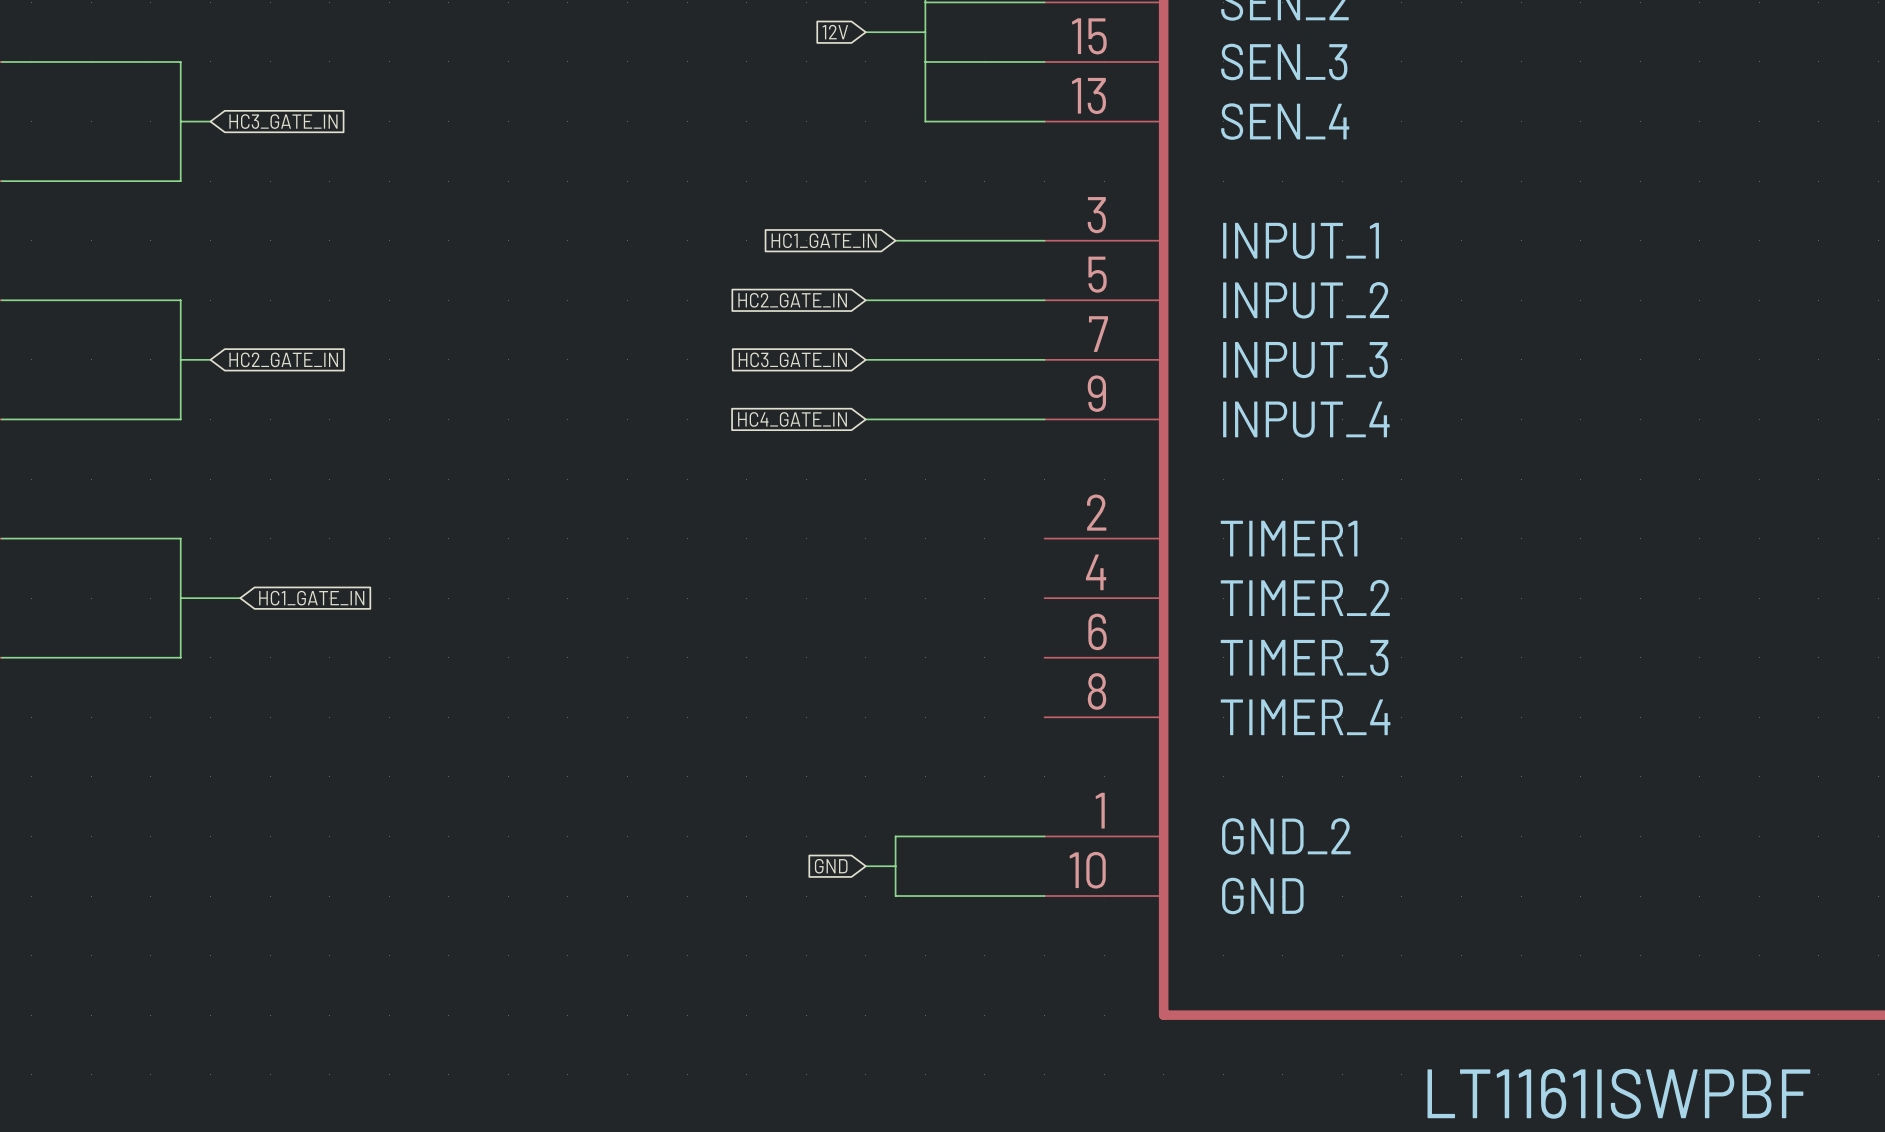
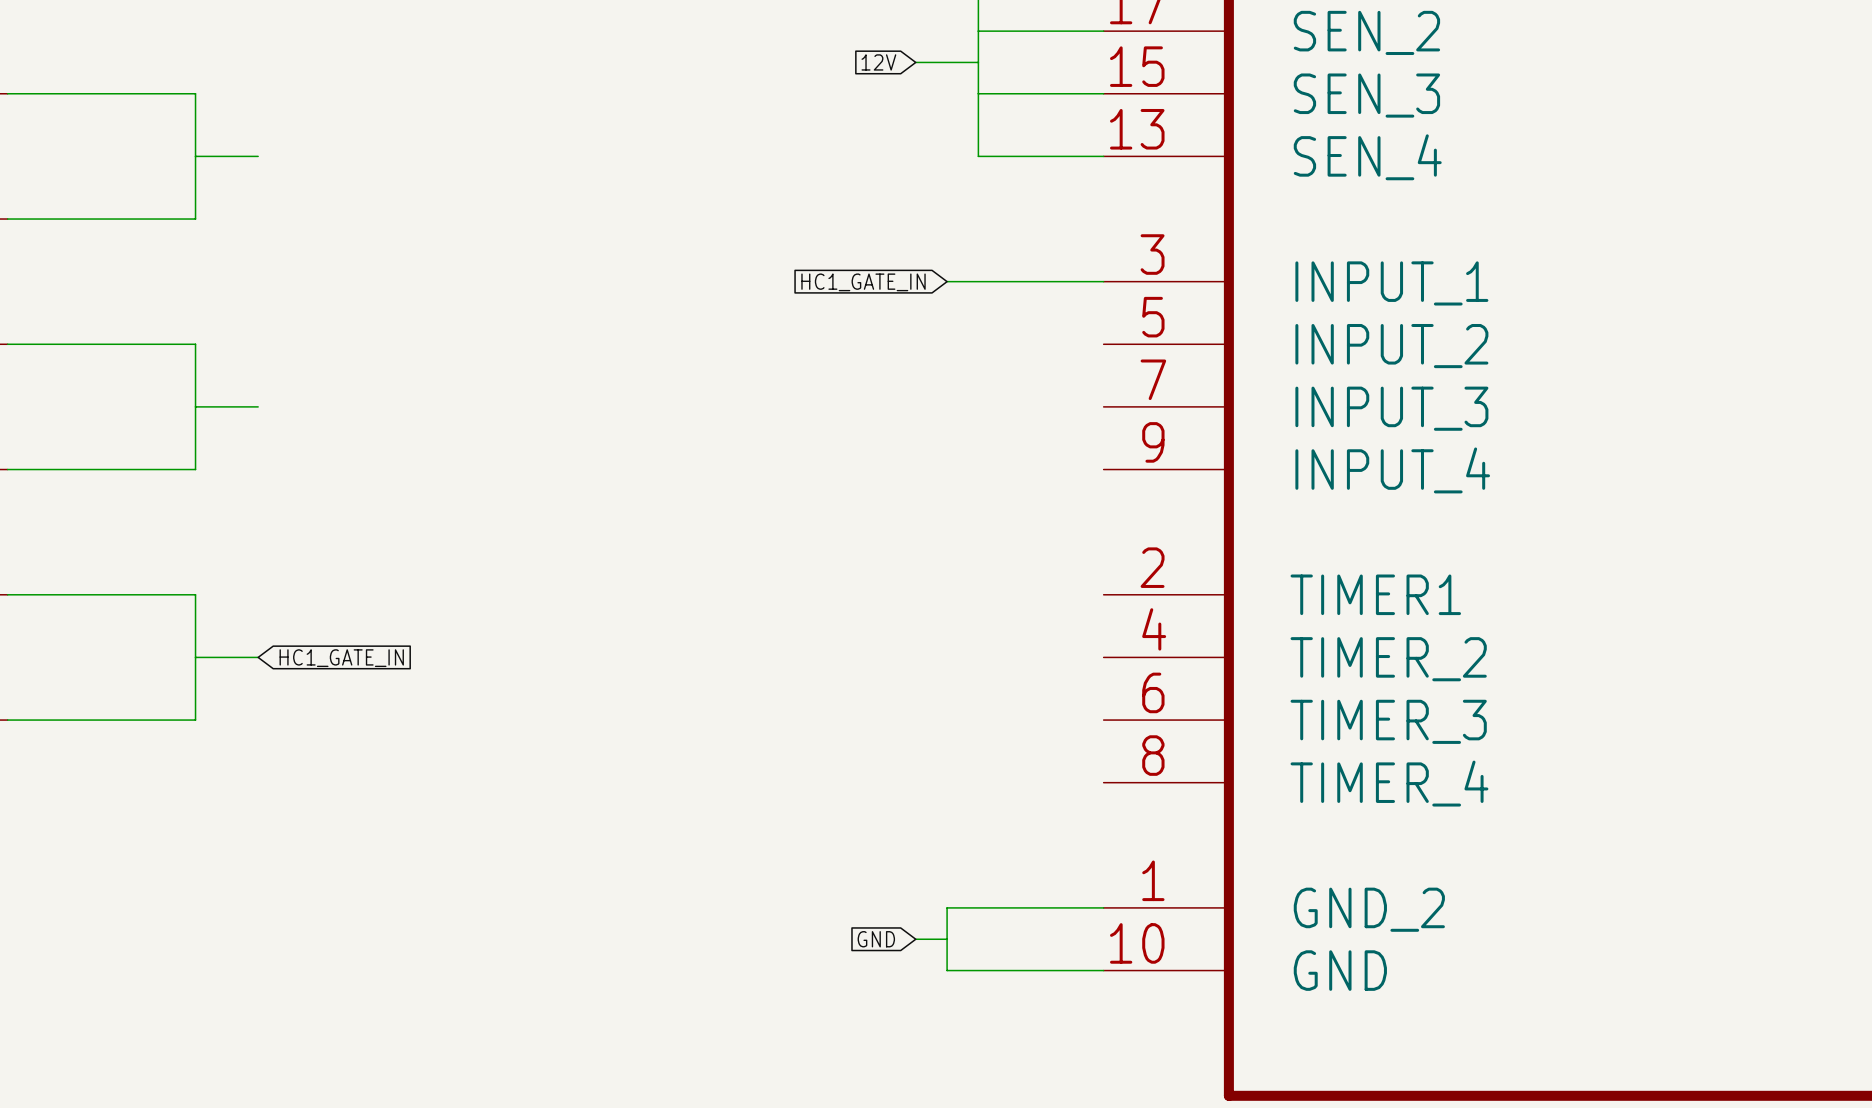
wire: none -> (226, 156) (258, 156)
global label: HC3_GATE_IN (283, 121) -> none
global label: HC2_GATE_IN (792, 300) -> none
wire: (865, 300) (1044, 300) -> none
wire: none -> (226, 406) (258, 406)
global label: HC2_GATE_IN (283, 359) -> none
global label: HC3_GATE_IN (792, 359) -> none
wire: (865, 359) (1044, 359) -> none
global label: HC4_GATE_IN (792, 419) -> none
wire: (865, 419) (1044, 419) -> none

